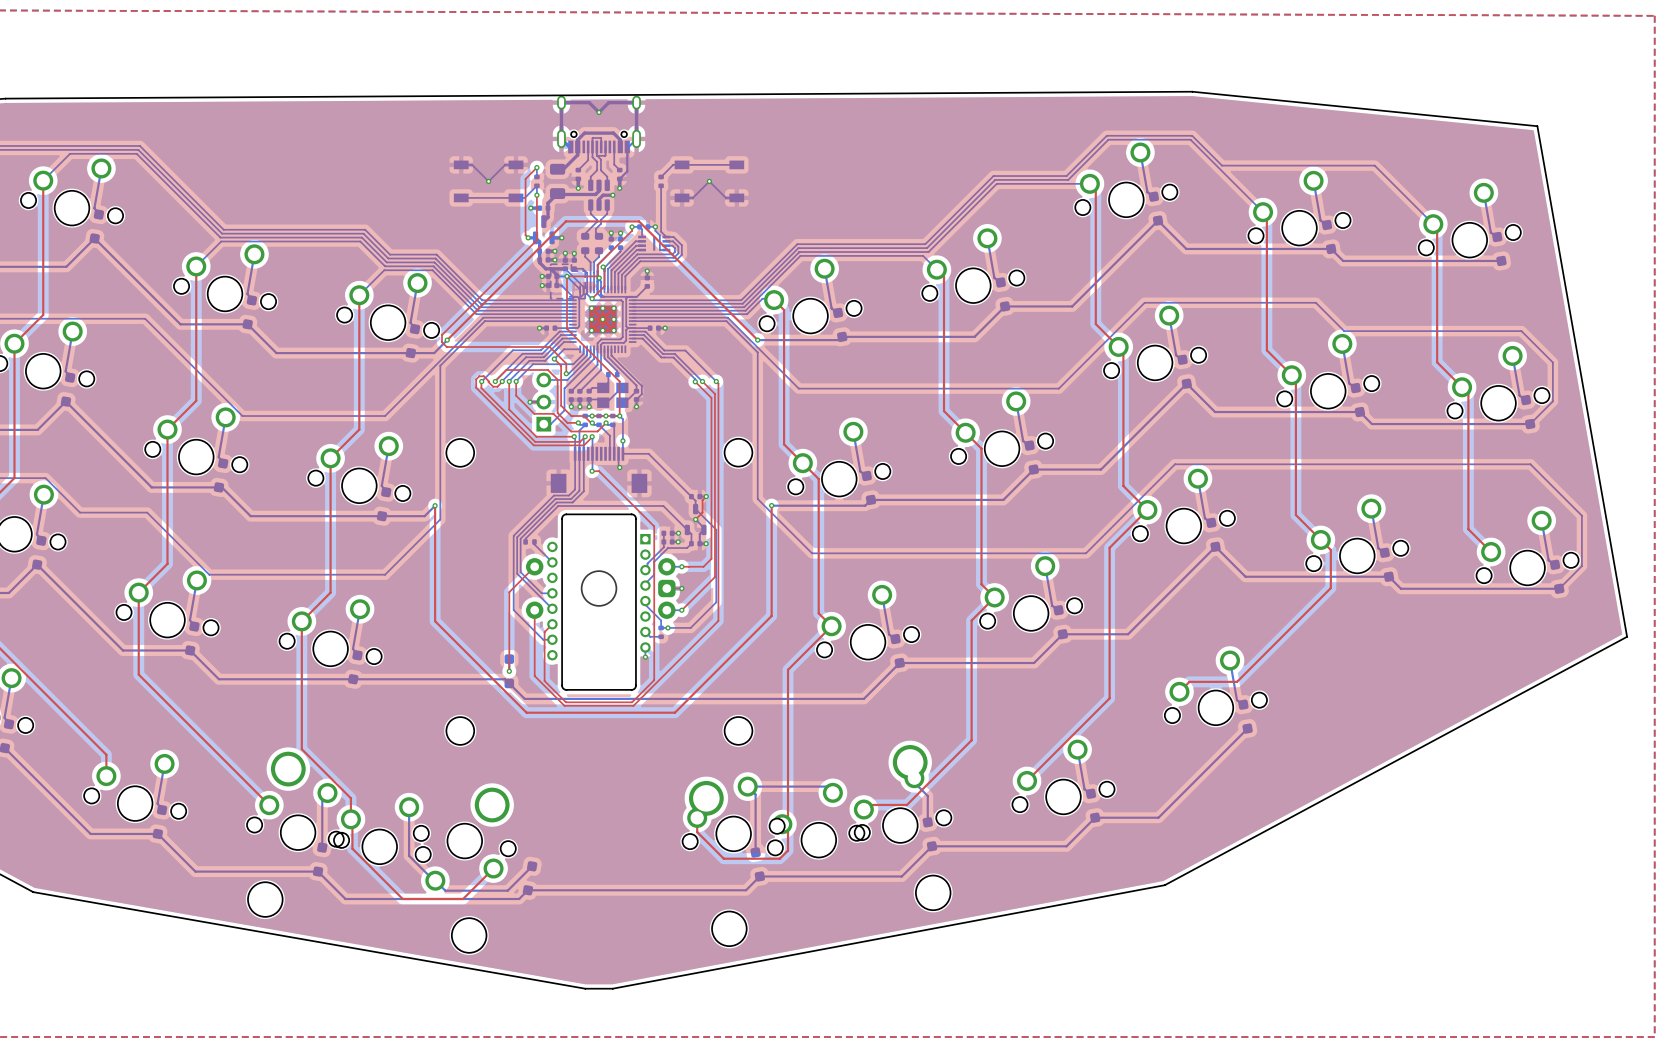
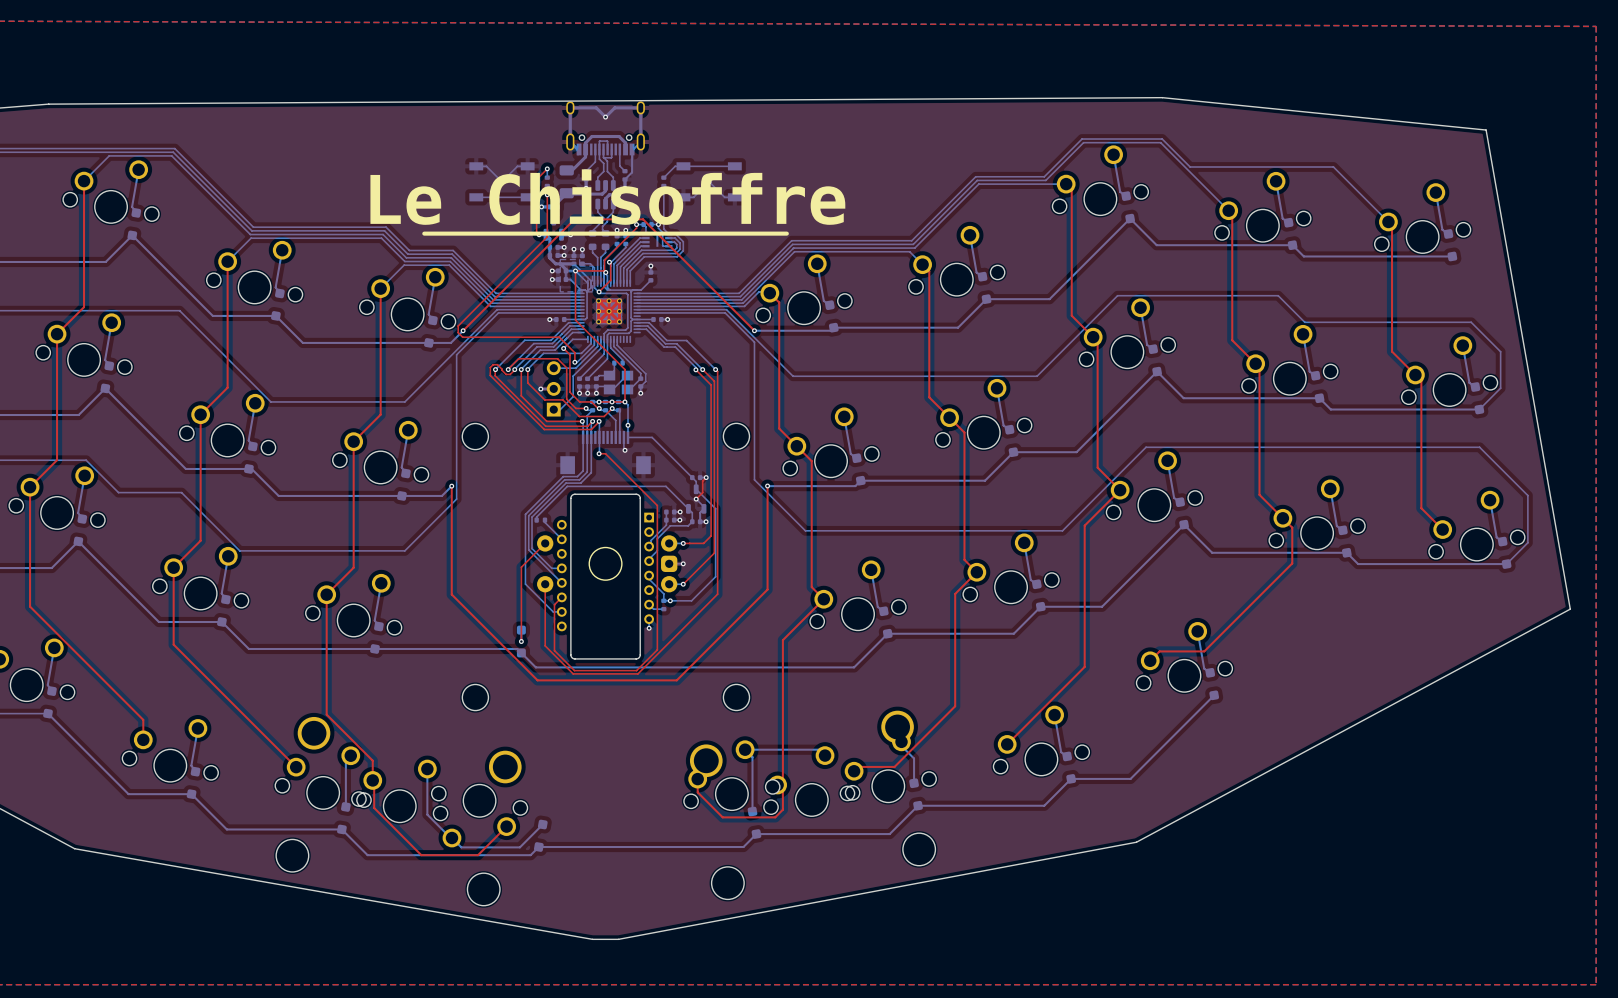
text: none -> Le Chisoffre (607, 197)
line: none -> (424, 233) (786, 233)

